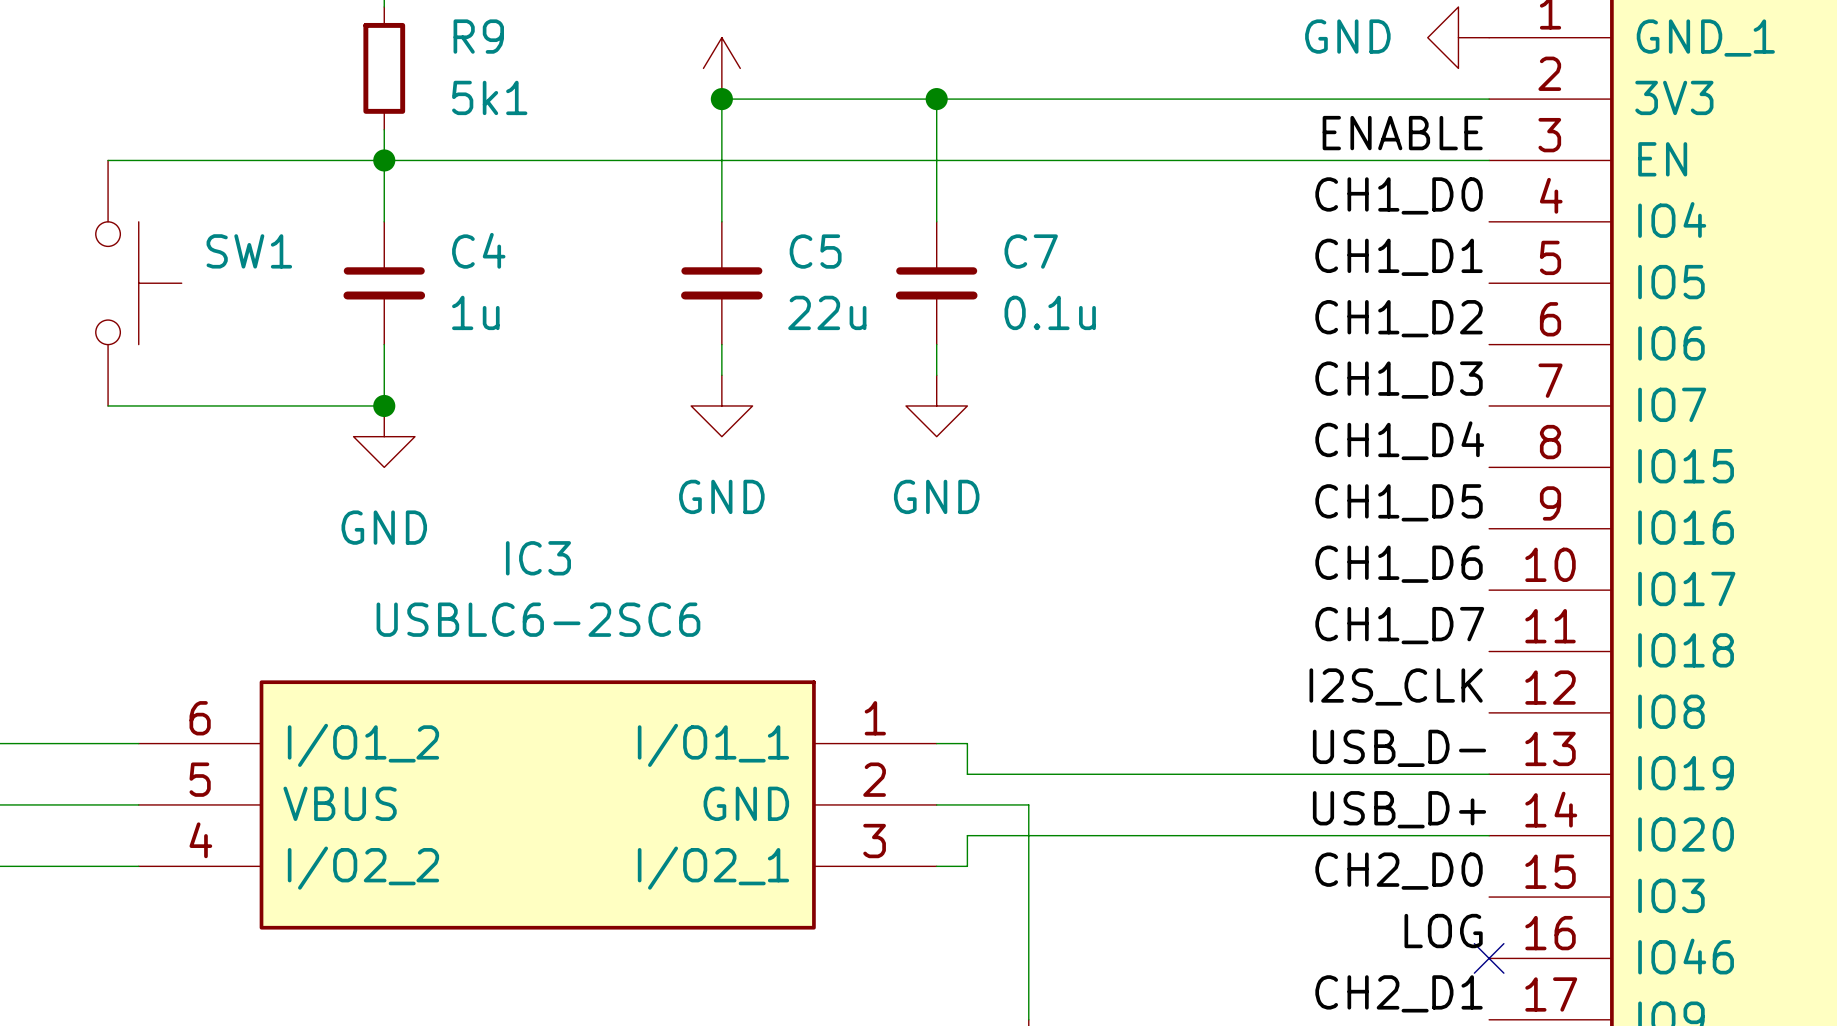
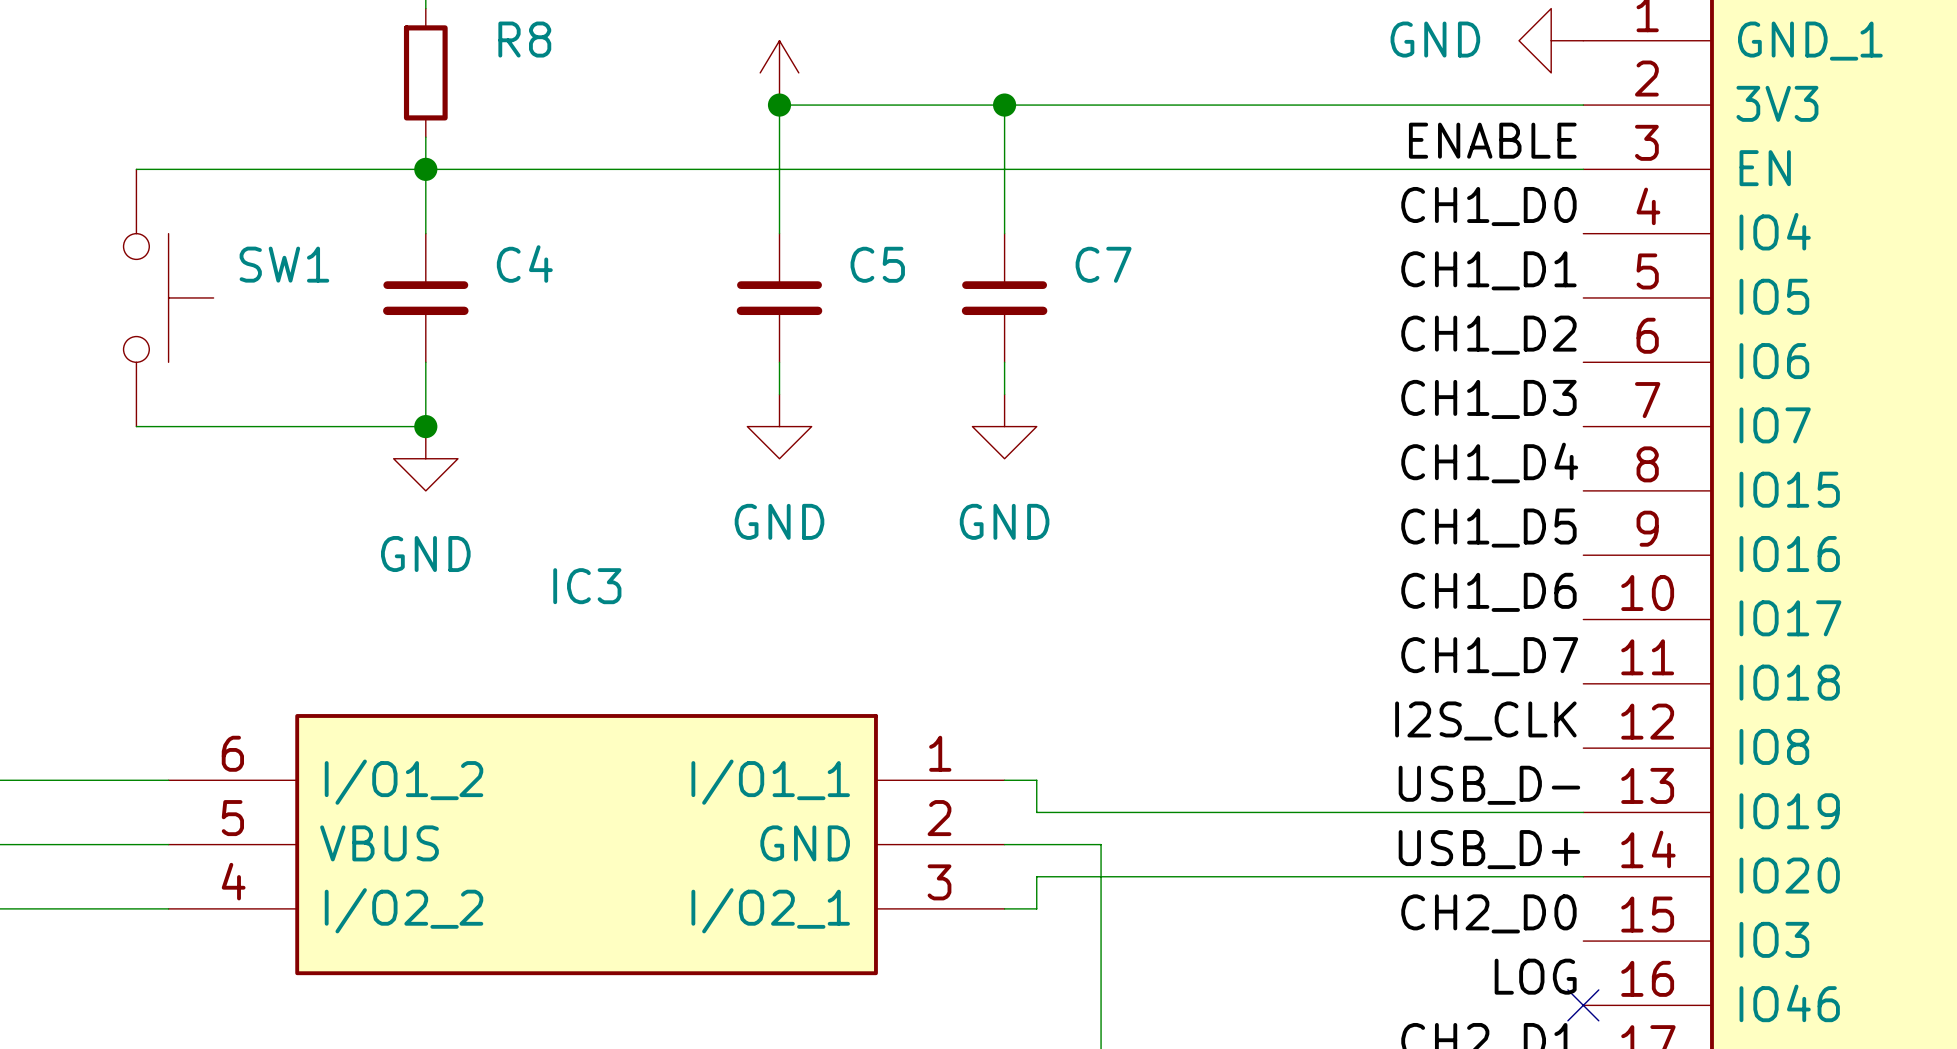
R9 name: R9 (478, 36) -> R8 (524, 39)
R9 value: 5k1 (489, 97) -> none
C4 value: 1u (475, 312) -> none
C5 value: 22u (827, 312) -> none
C7 value: 0.1u (1050, 312) -> none
IC3 value: USBLC6-2SC6 (538, 619) -> none

